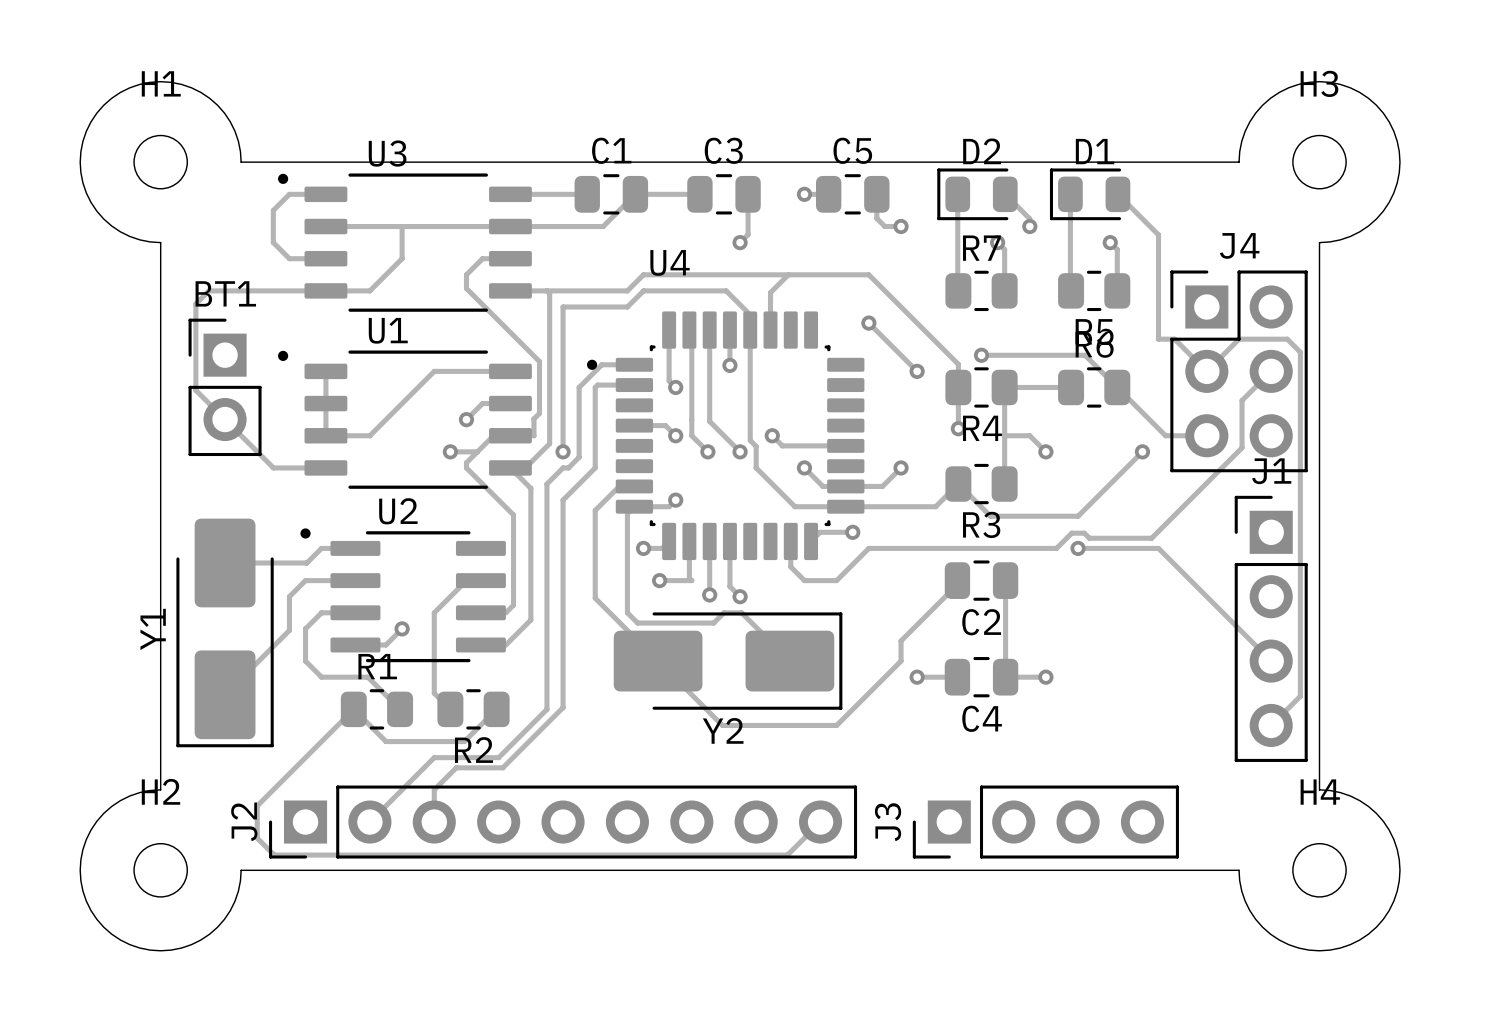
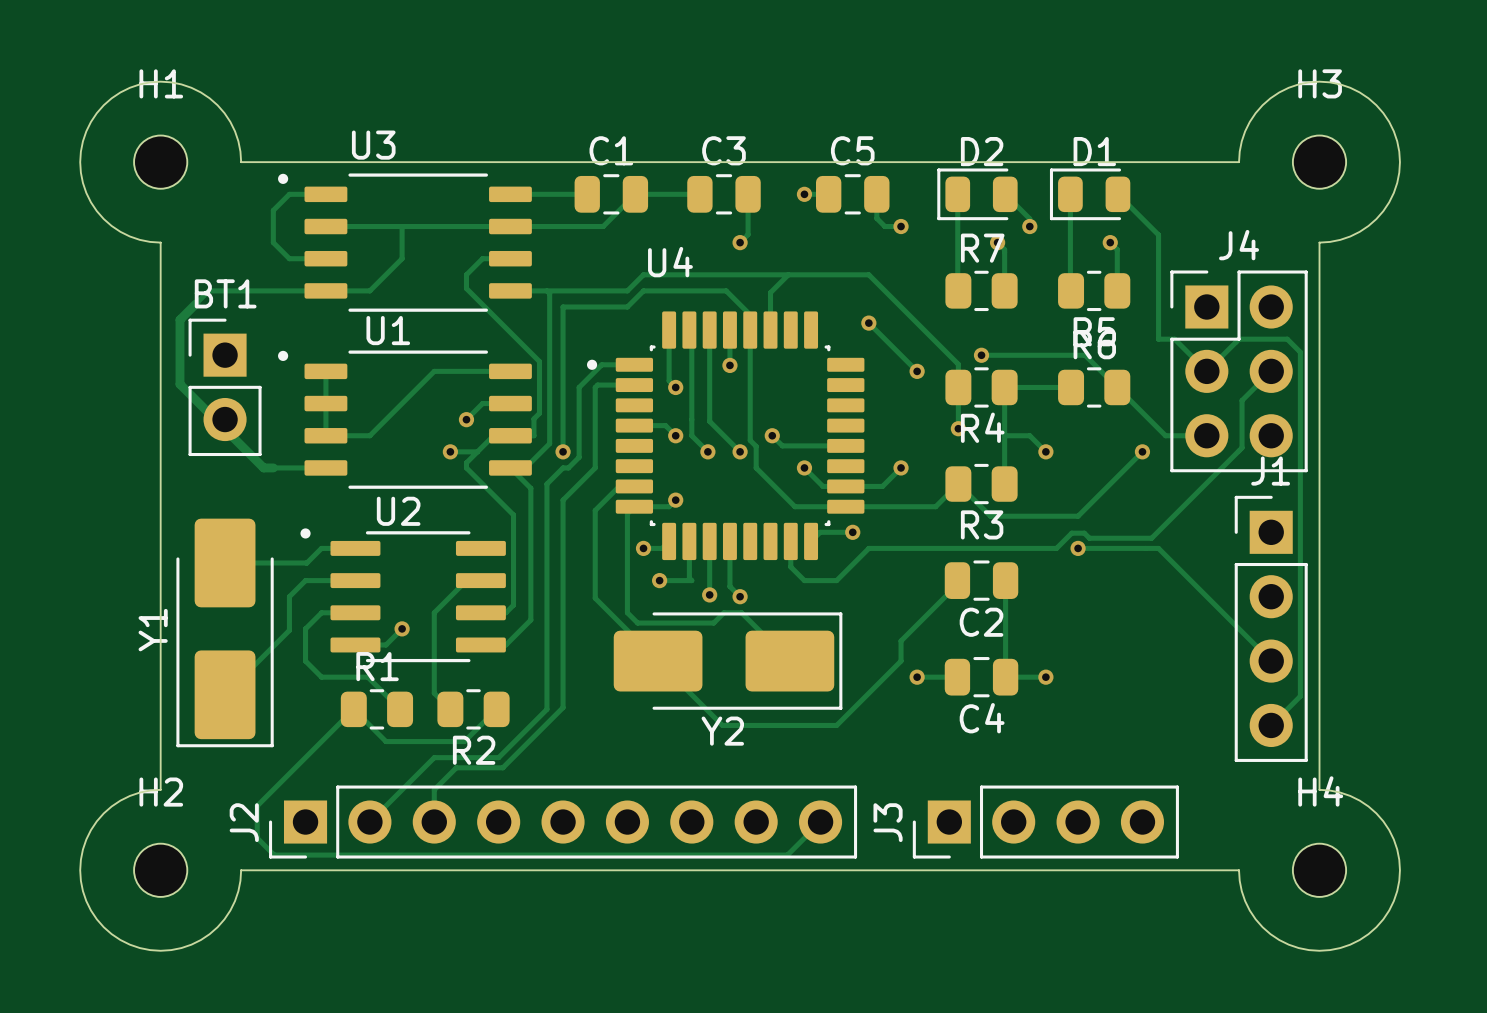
U3 name position: U3 (387, 153) -> U3 (373, 145)
track: (195, 303) (195, 390) (273, 467) -> (195, 303) (179, 319) (179, 384) (263, 467) (273, 467)

